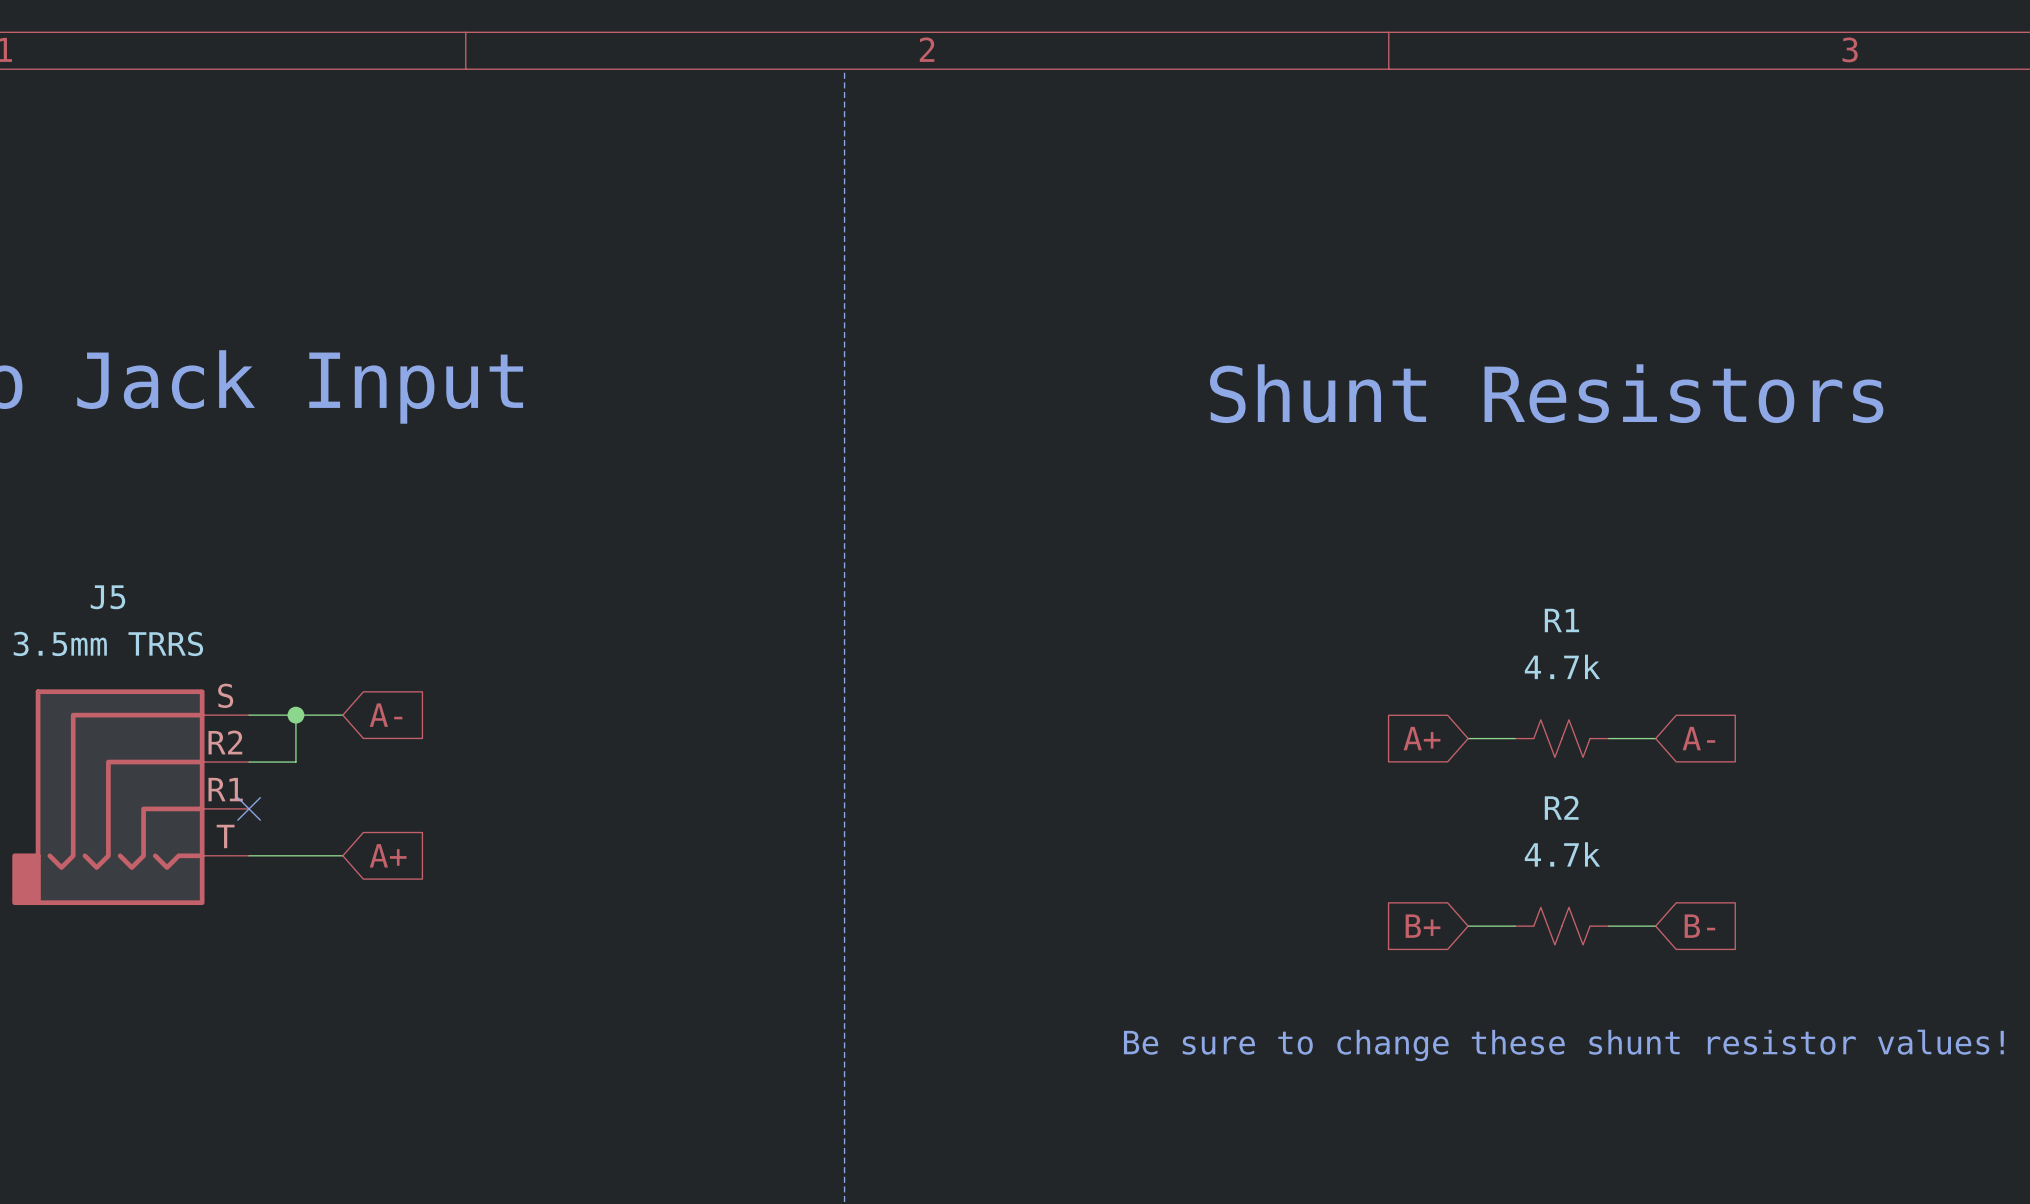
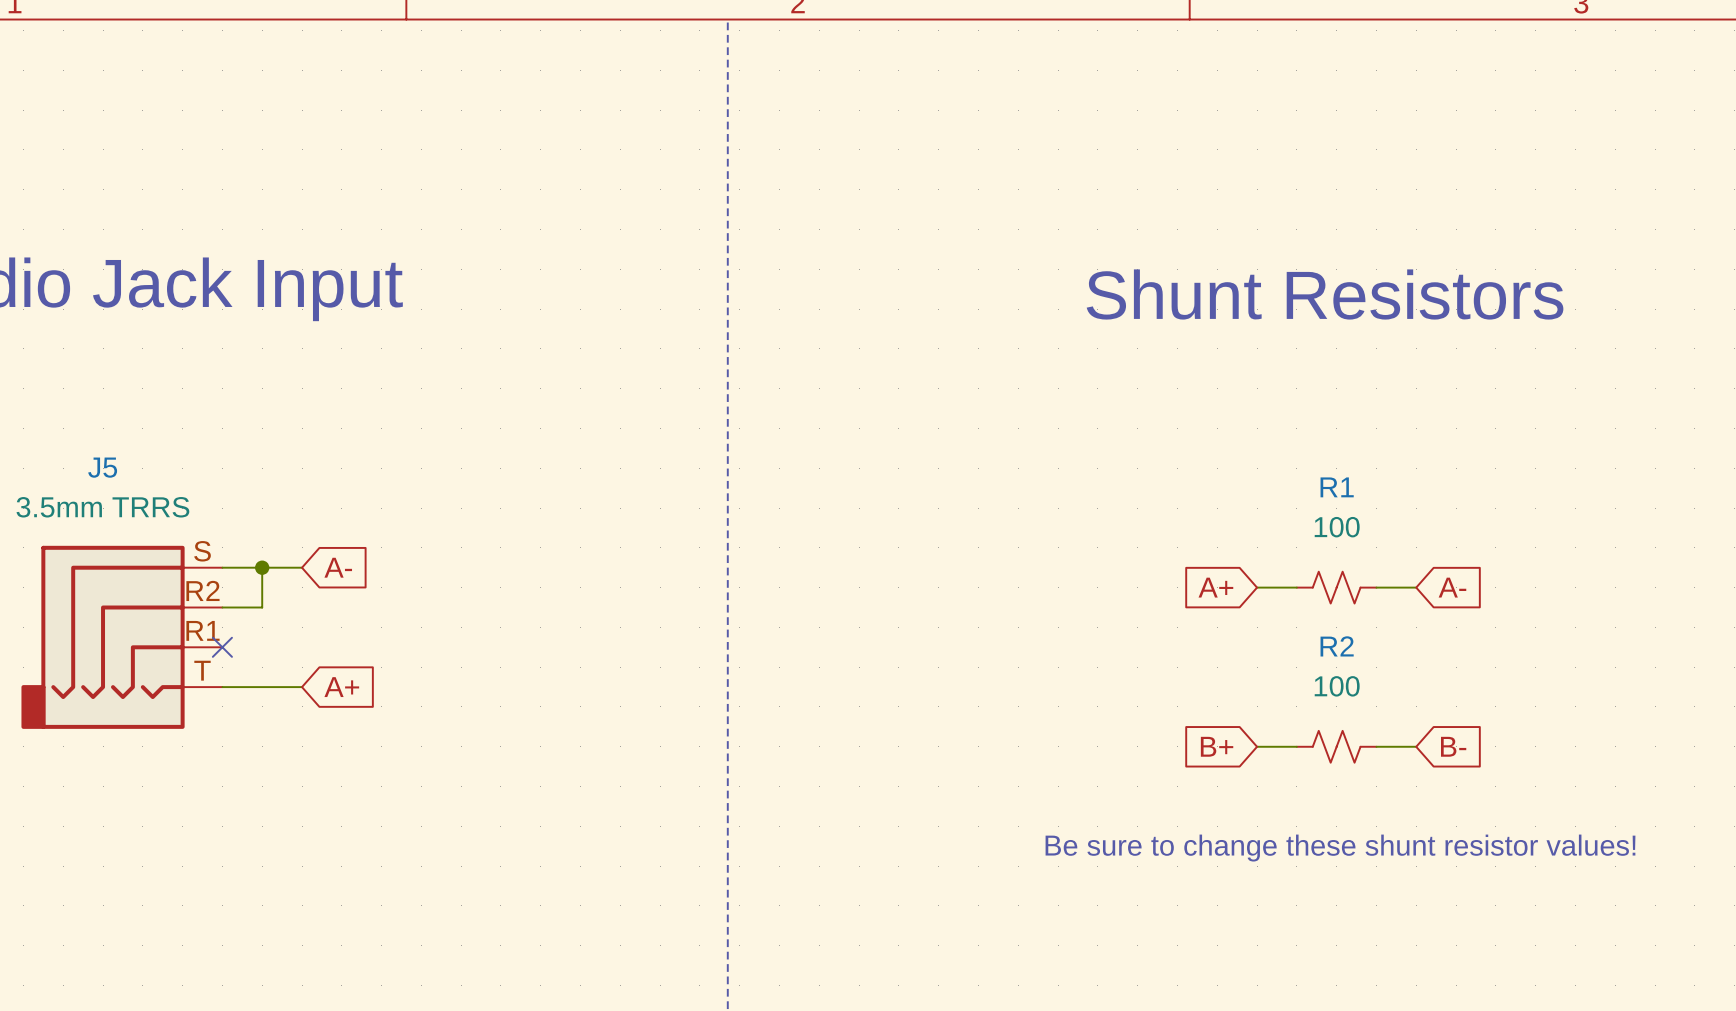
R1 value: 4.7k (1562, 666) -> 100 (1337, 527)
R2 value: 4.7k (1562, 854) -> 100 (1337, 686)

